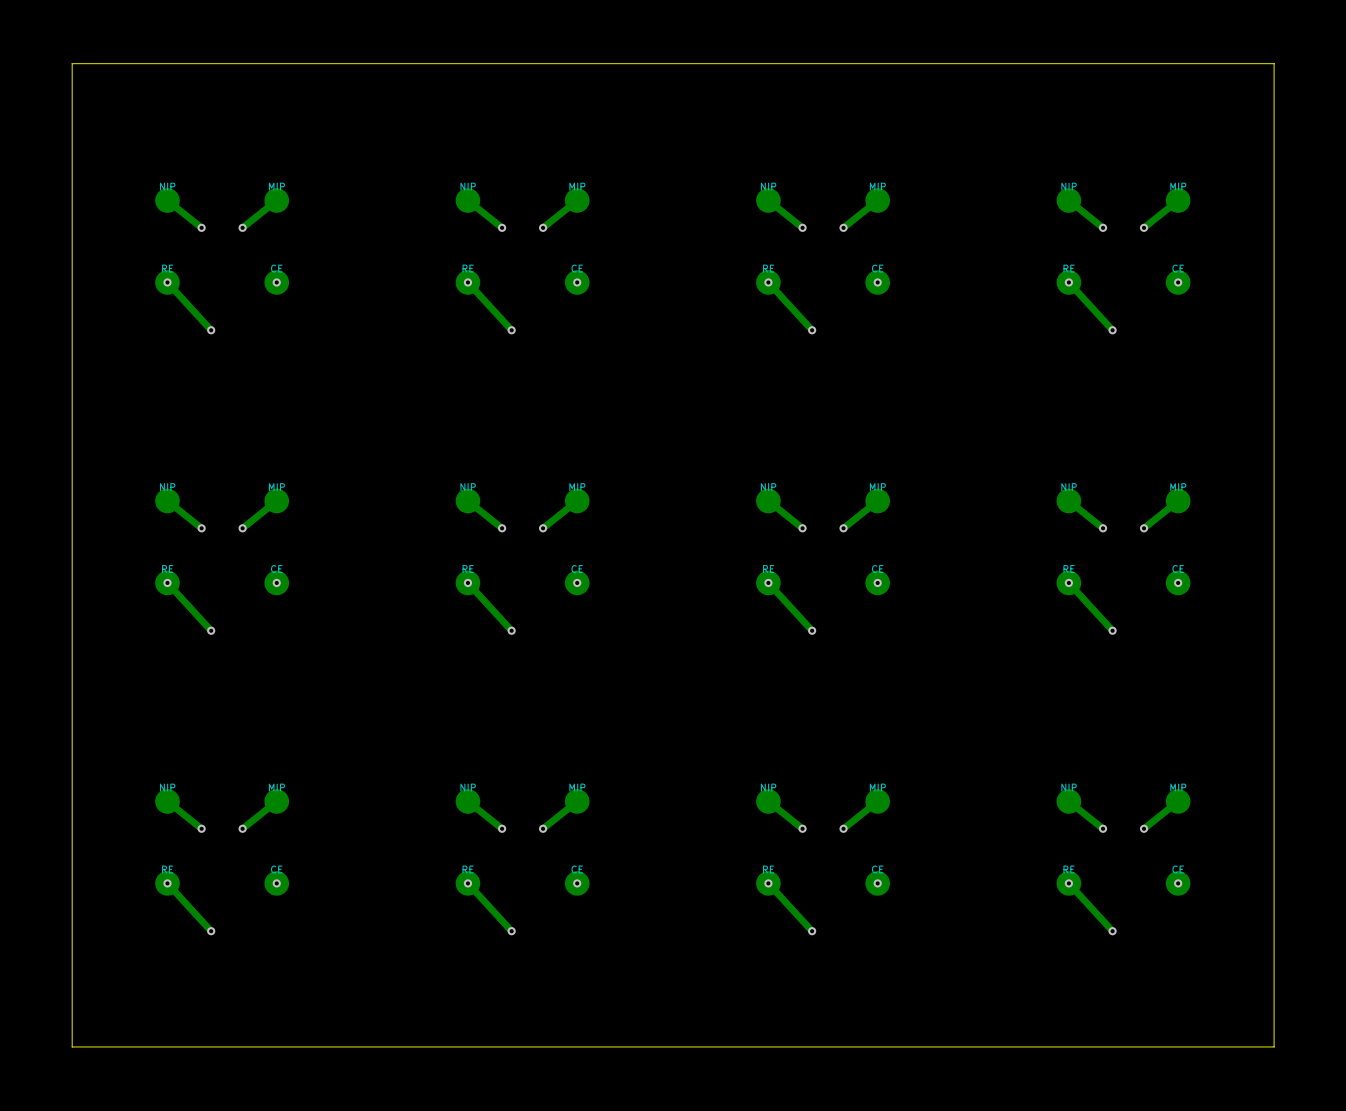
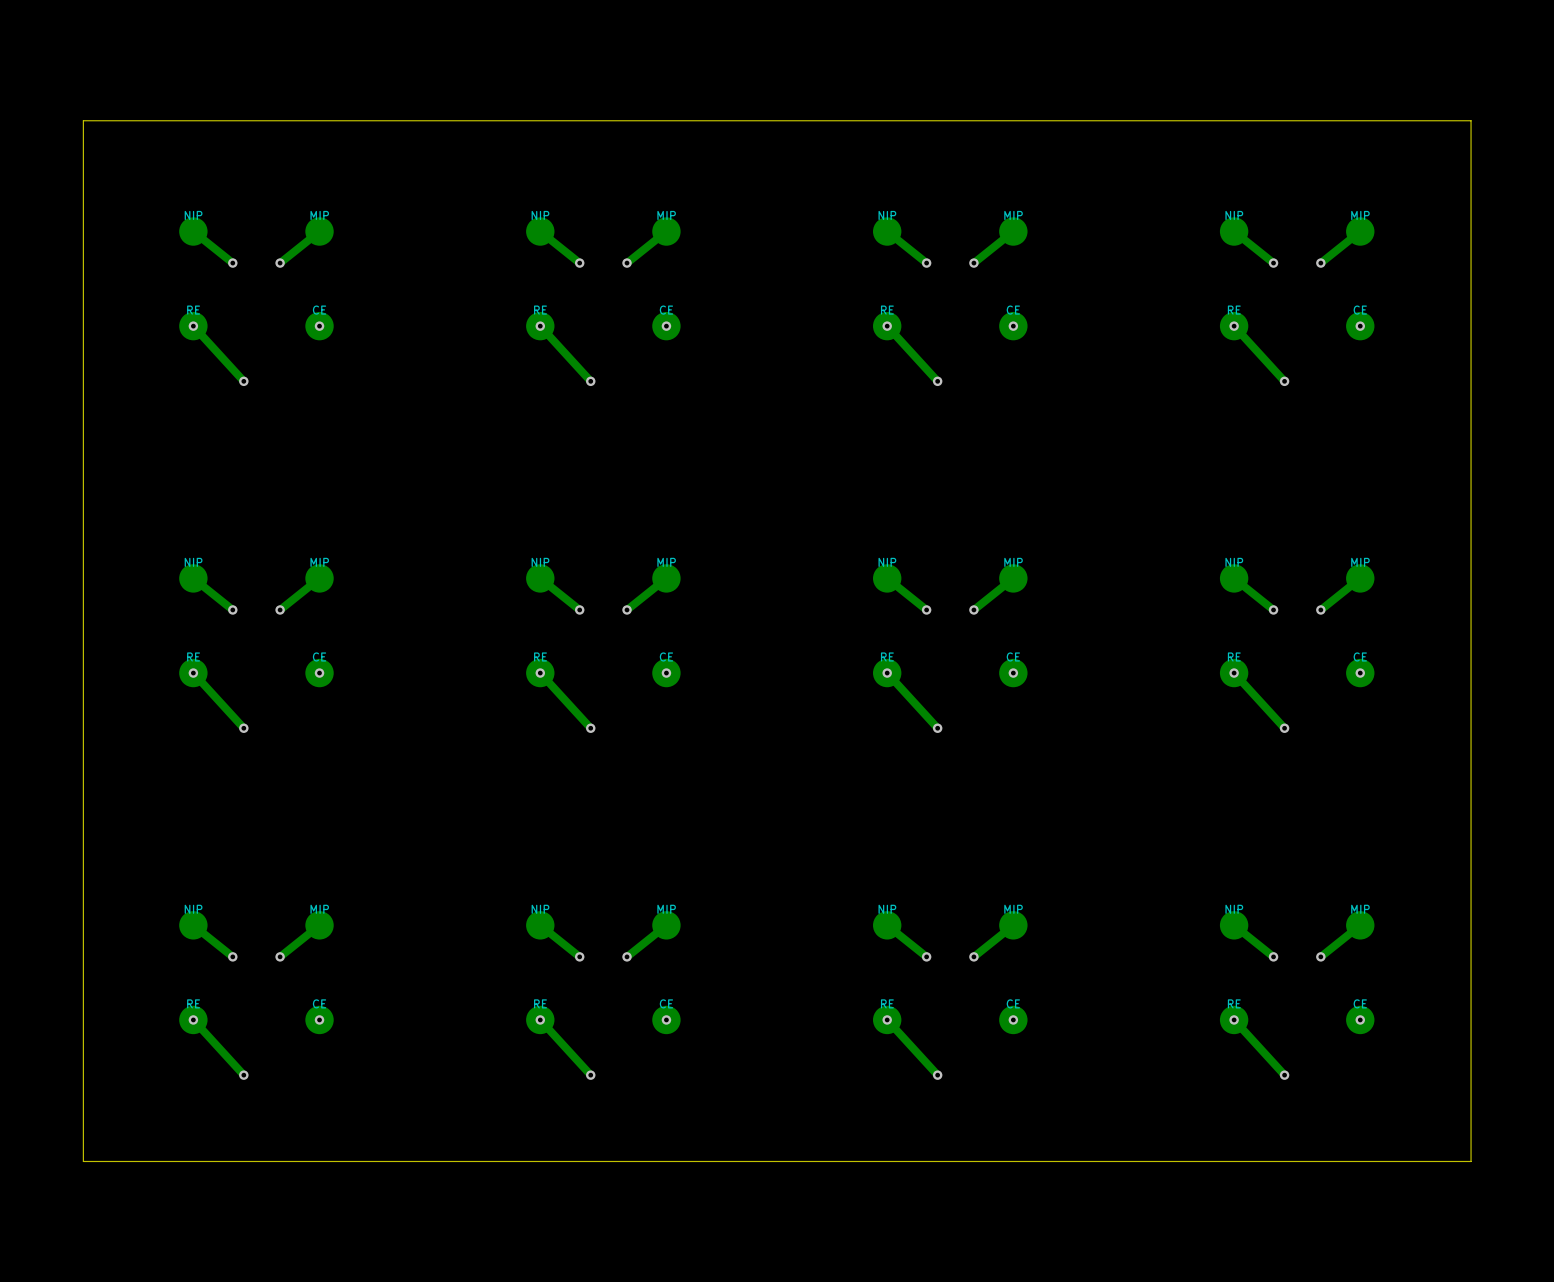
board edge: (1274, 104) (1274, 63) (72, 63) (72, 104) -> (1471, 120) (83, 120)
board edge: (1274, 1005) (1274, 1046) (72, 1046) (72, 1005) -> (1471, 1161) (83, 1161)

